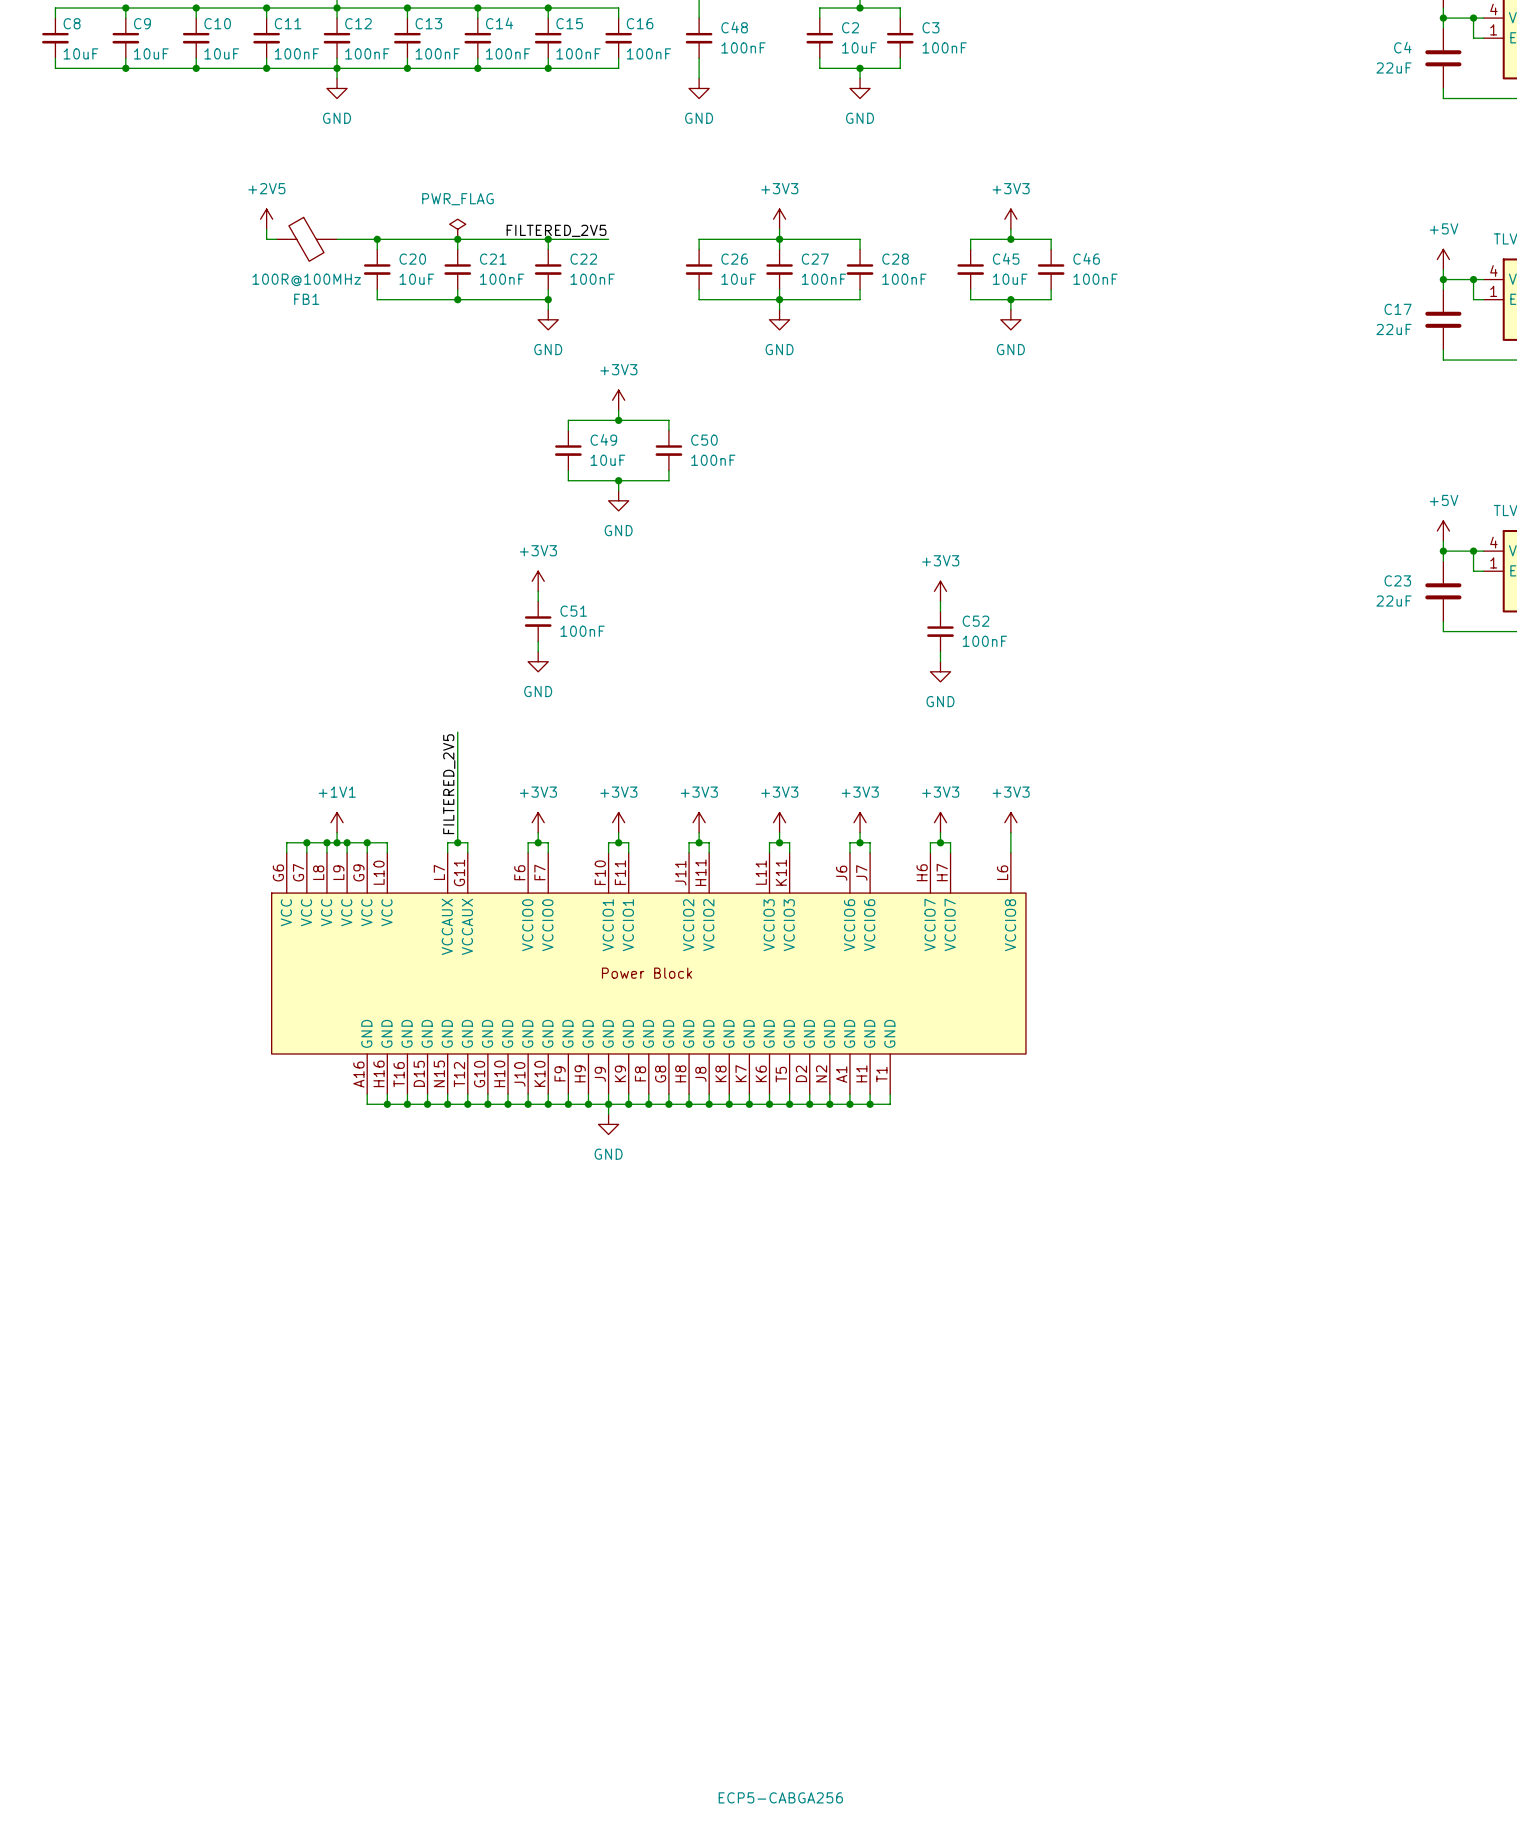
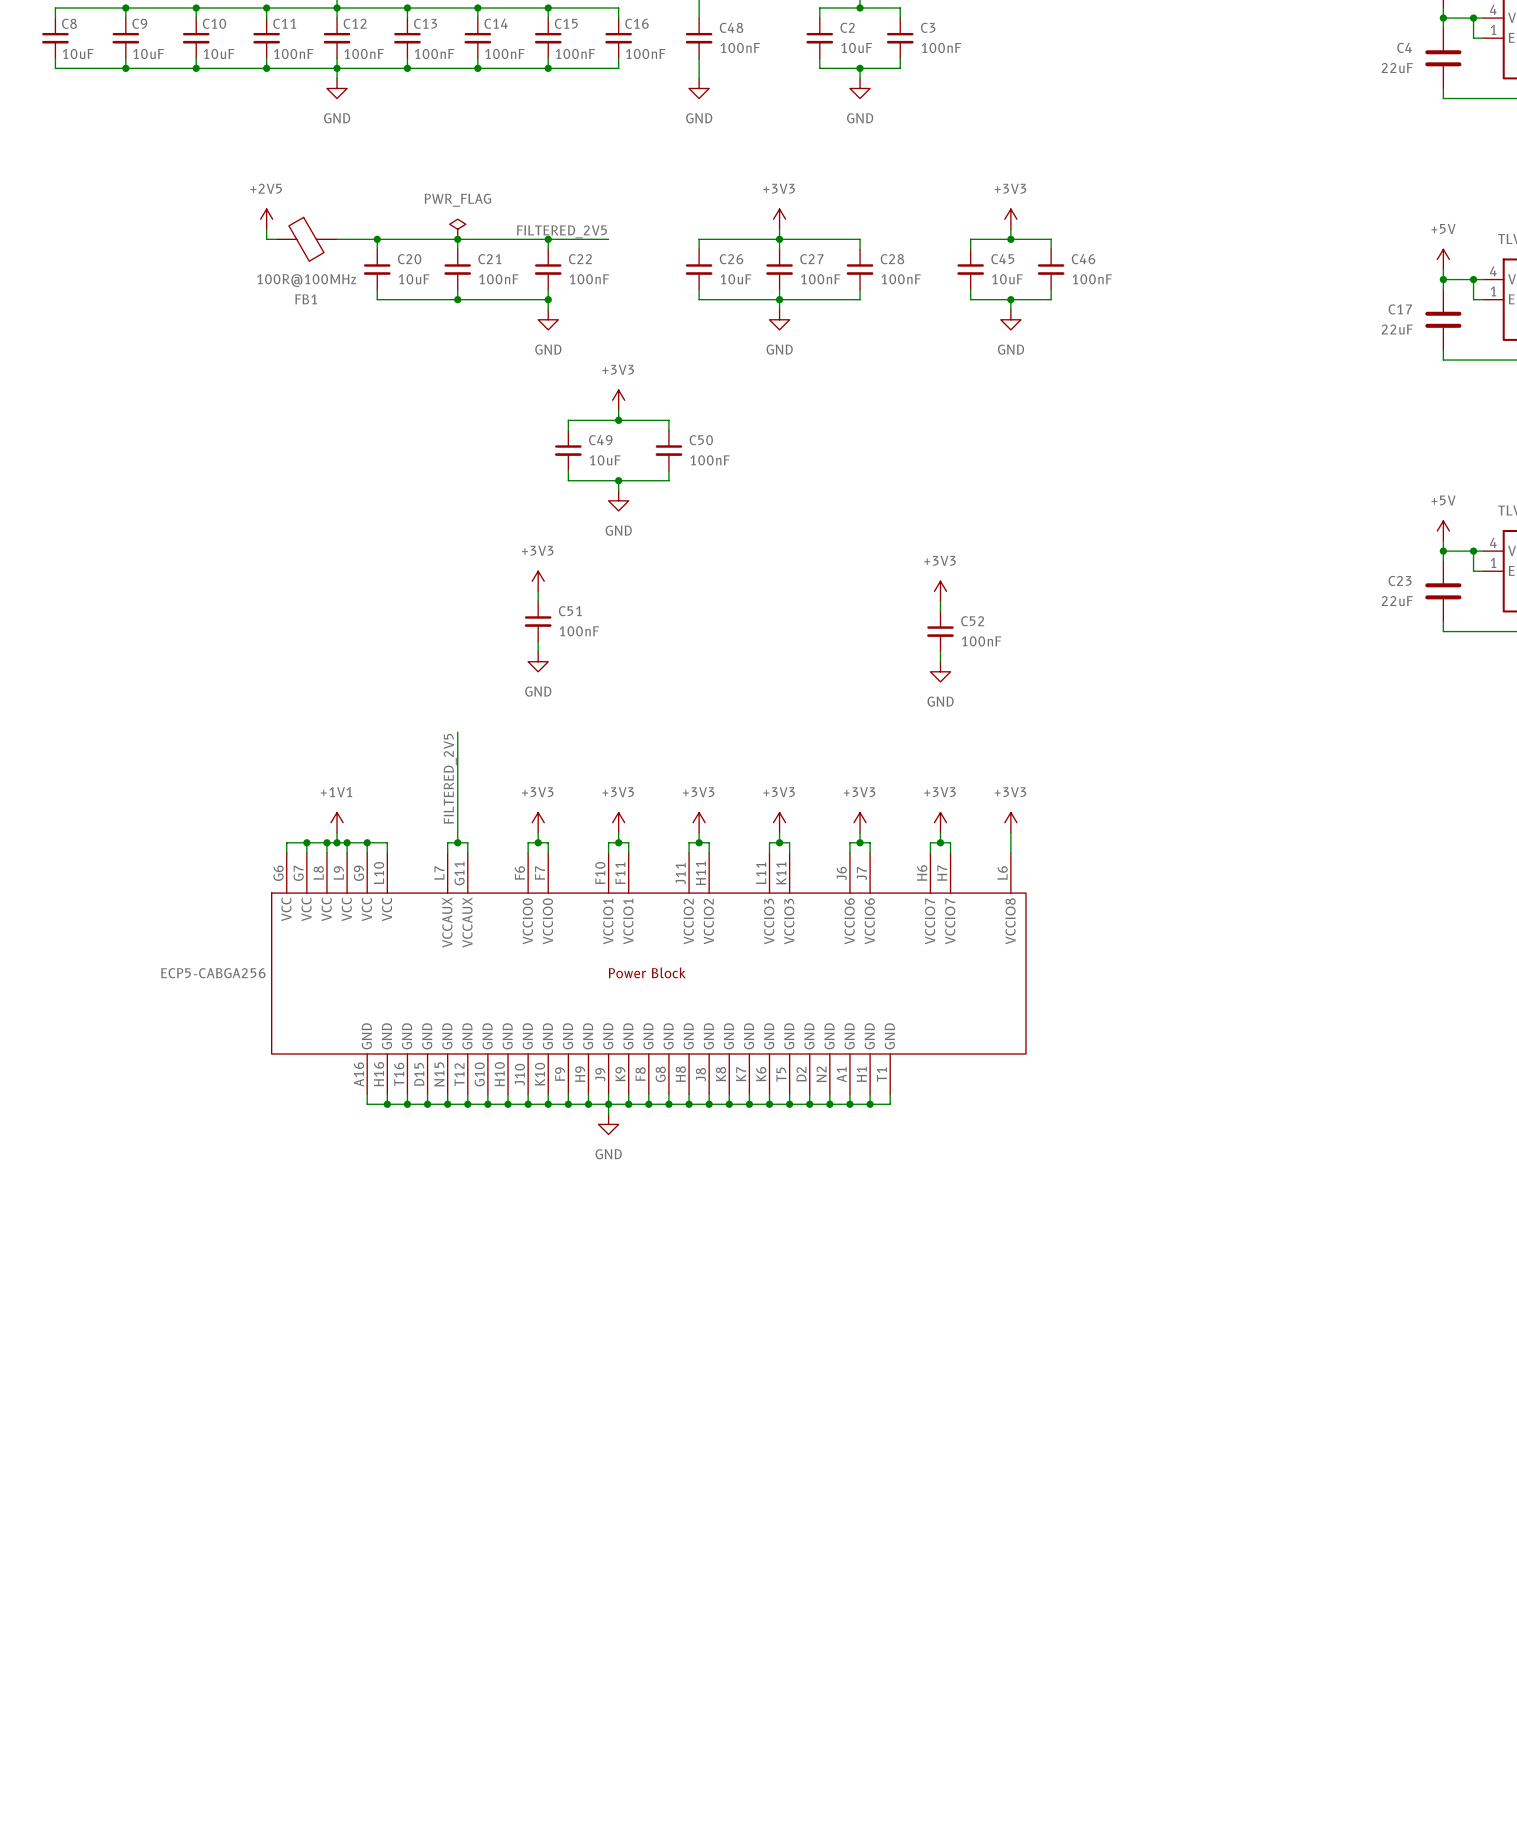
part value position: ECP5-CABGA256 (780, 1797) -> ECP5-CABGA256 (213, 973)

